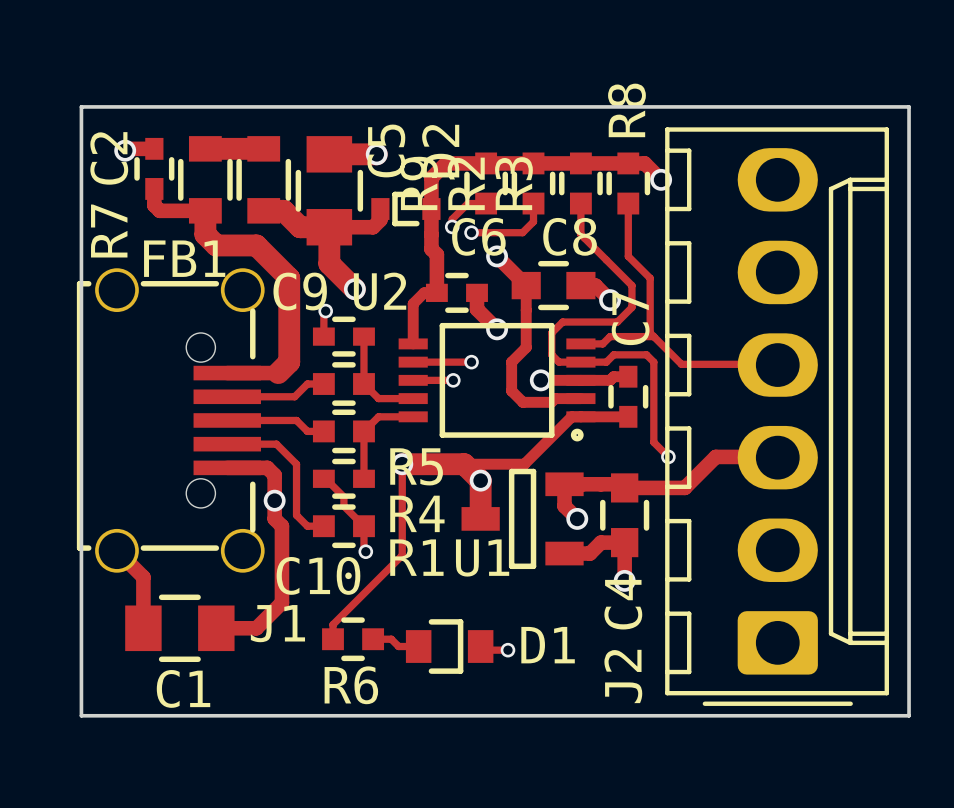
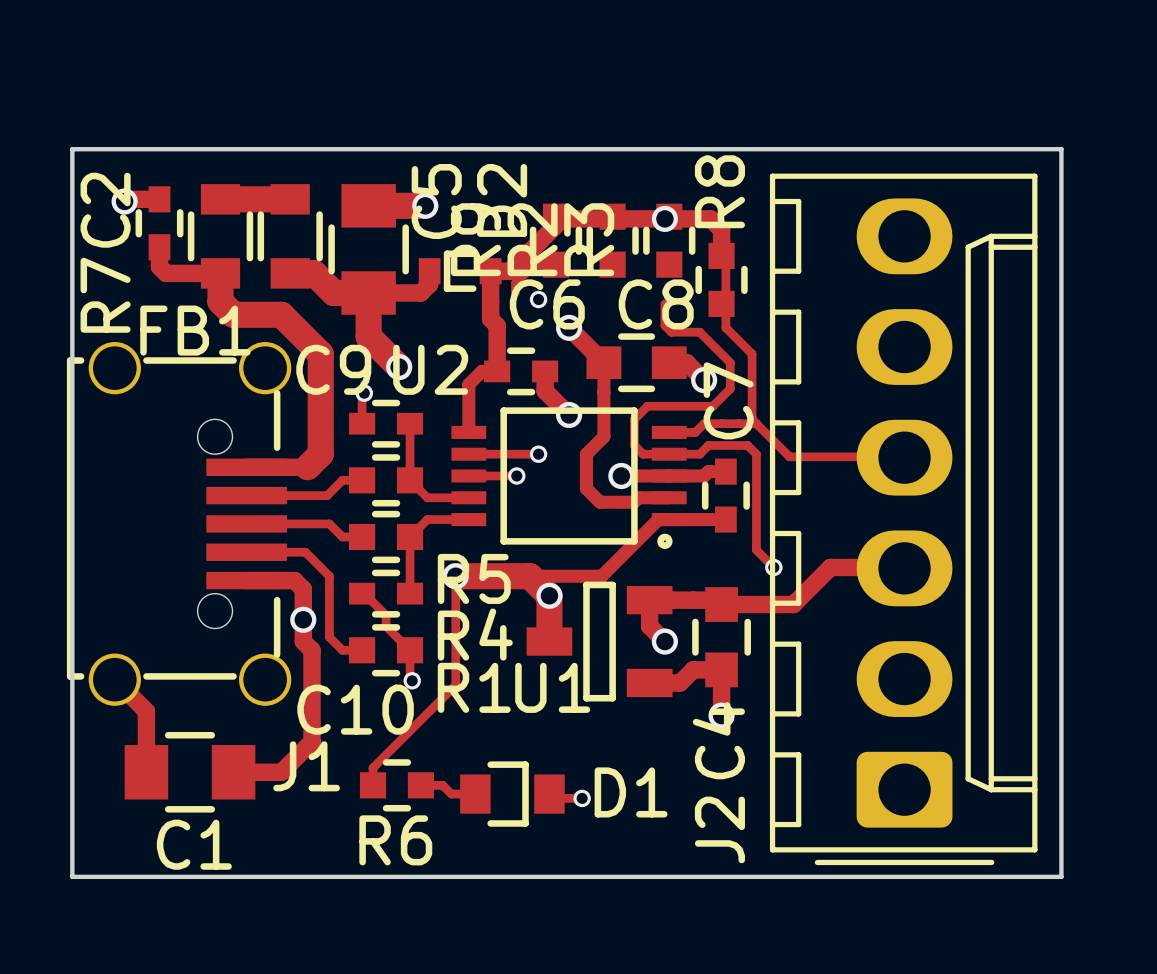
track: (661, 179) (644, 163) (446, 163) (431, 178) (431, 209) -> (721, 255) (721, 229) (710, 218) (562, 218) (510, 271) (490, 271)
via position: (661, 179) -> (664, 218)
R8 position: (628, 183) -> (721, 279)
track: (533, 203) (533, 221) (522, 232) (471, 232) -> none
track: (580, 203) (580, 234) (606, 260) -> (664, 303) (664, 325) (671, 332) (699, 332)
via: (452, 226) -> none

